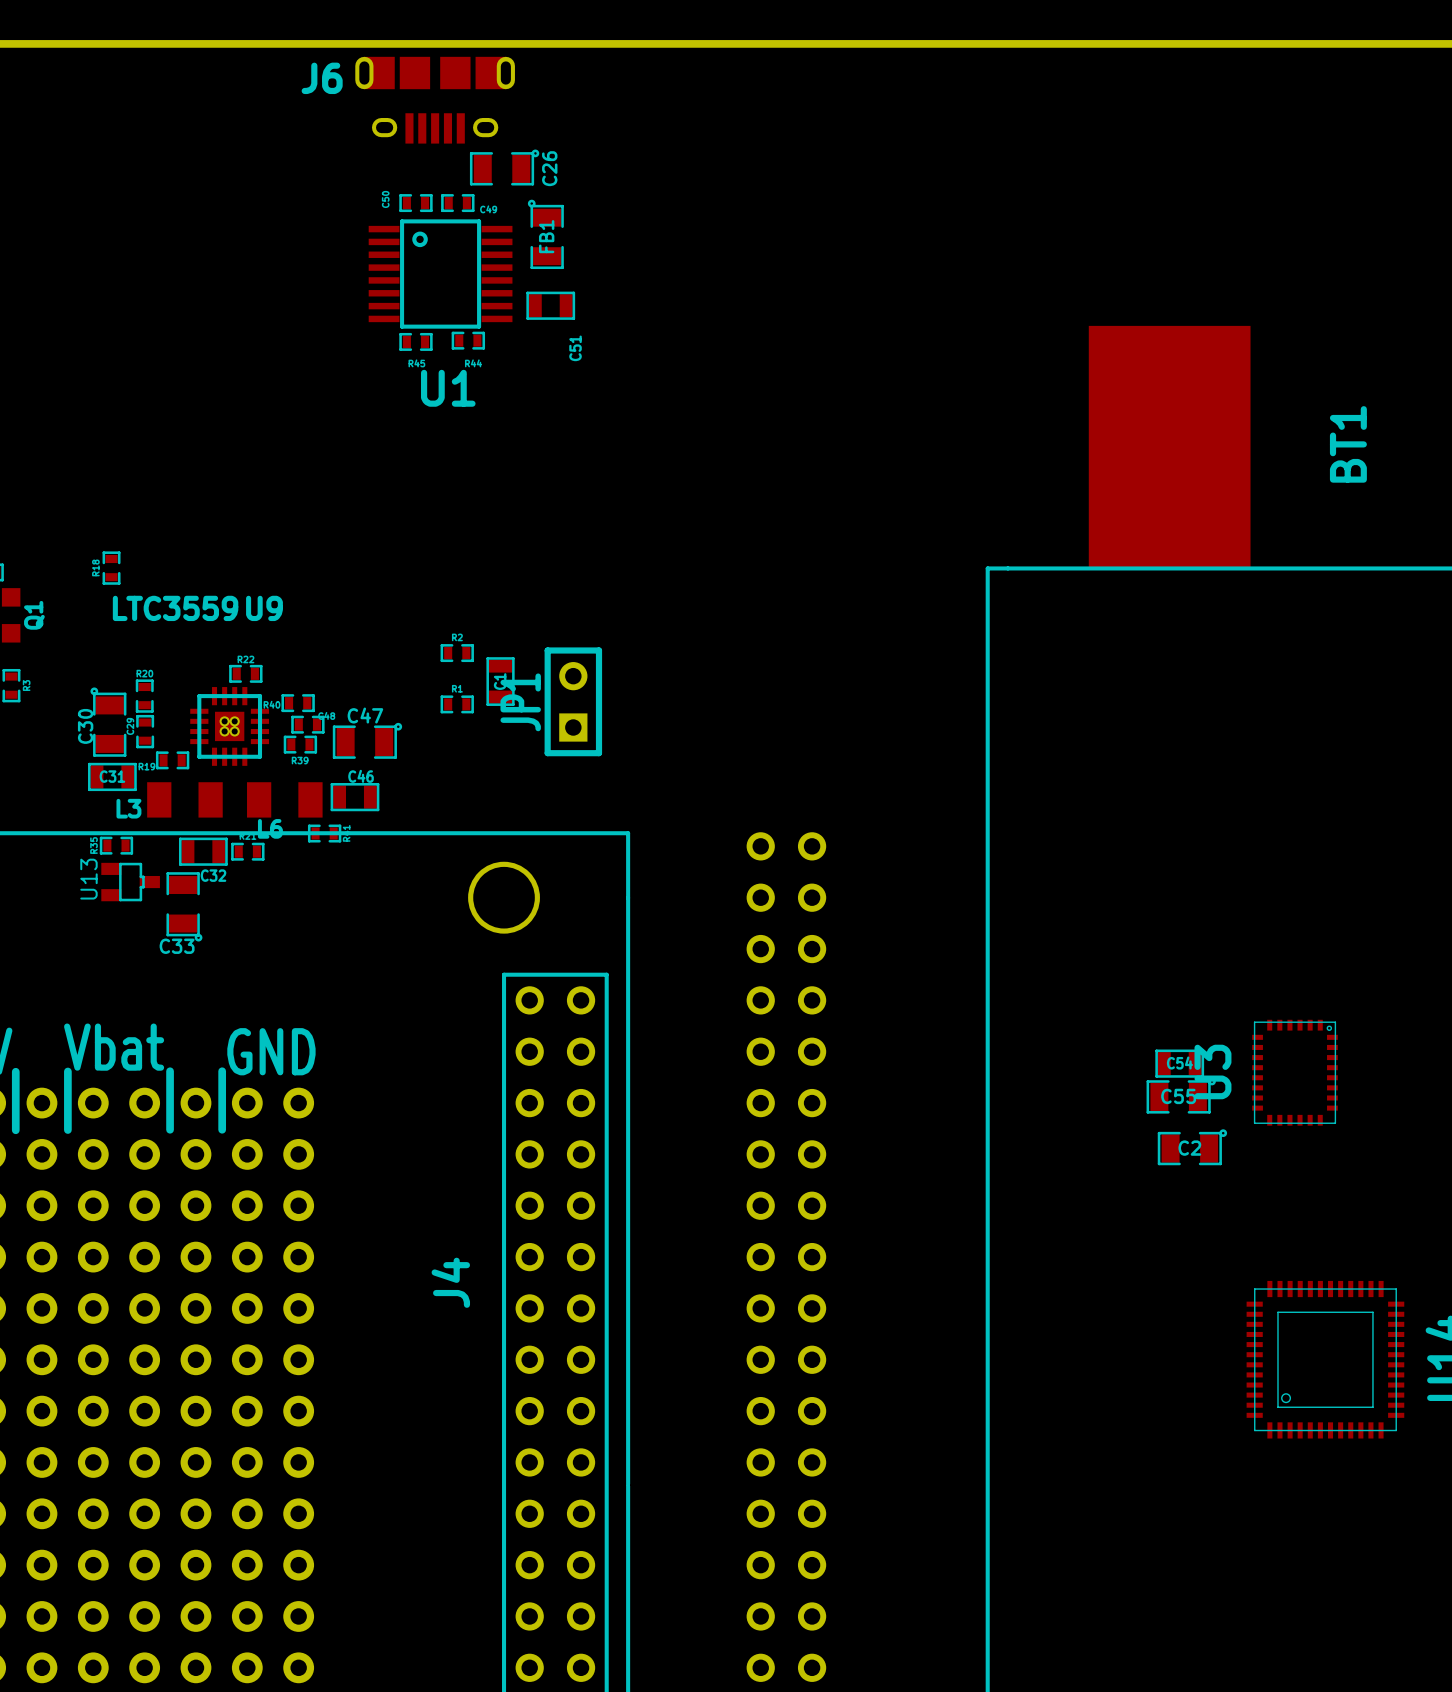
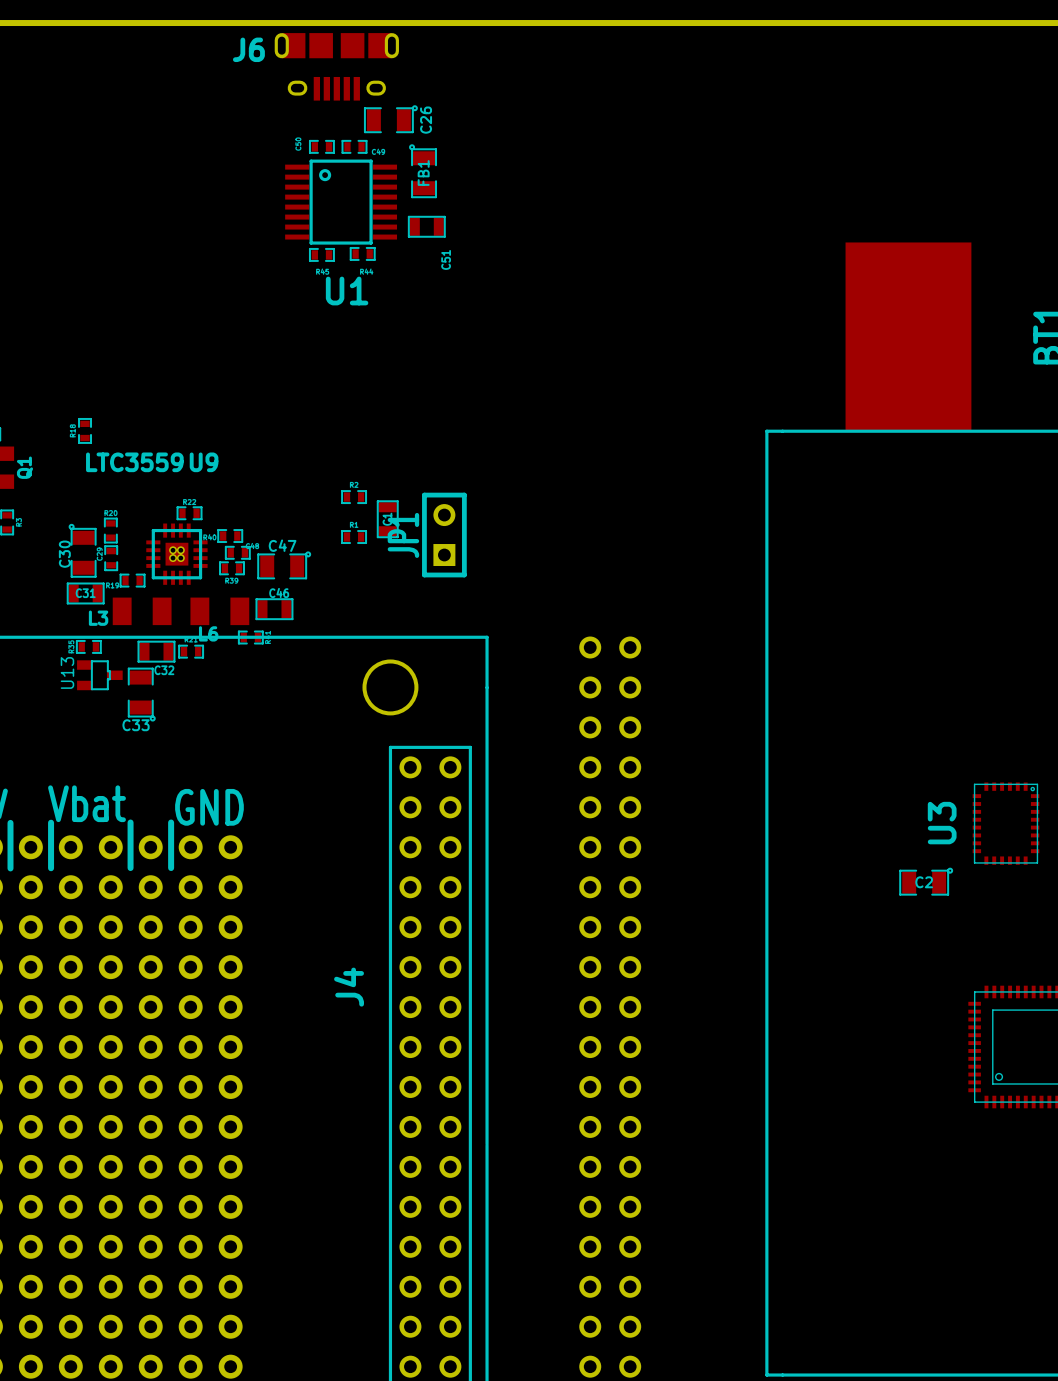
C54: (1179, 1063) -> none
C55: (1181, 1095) -> none

